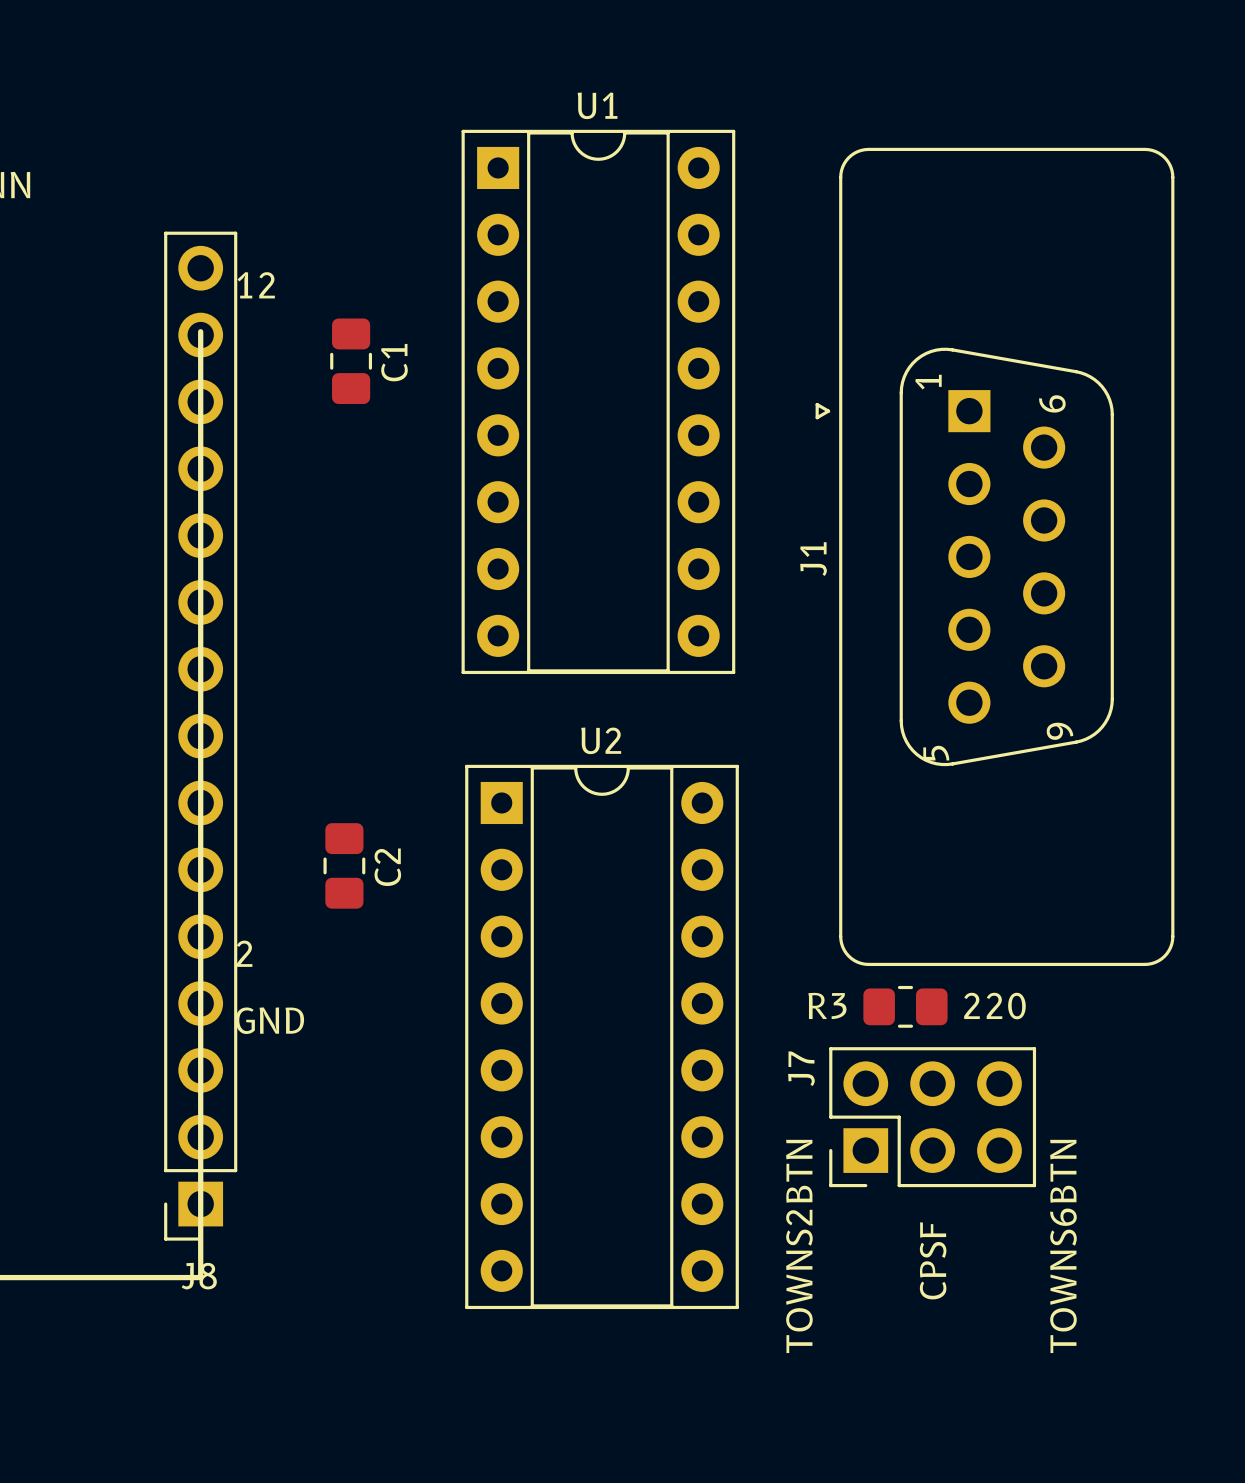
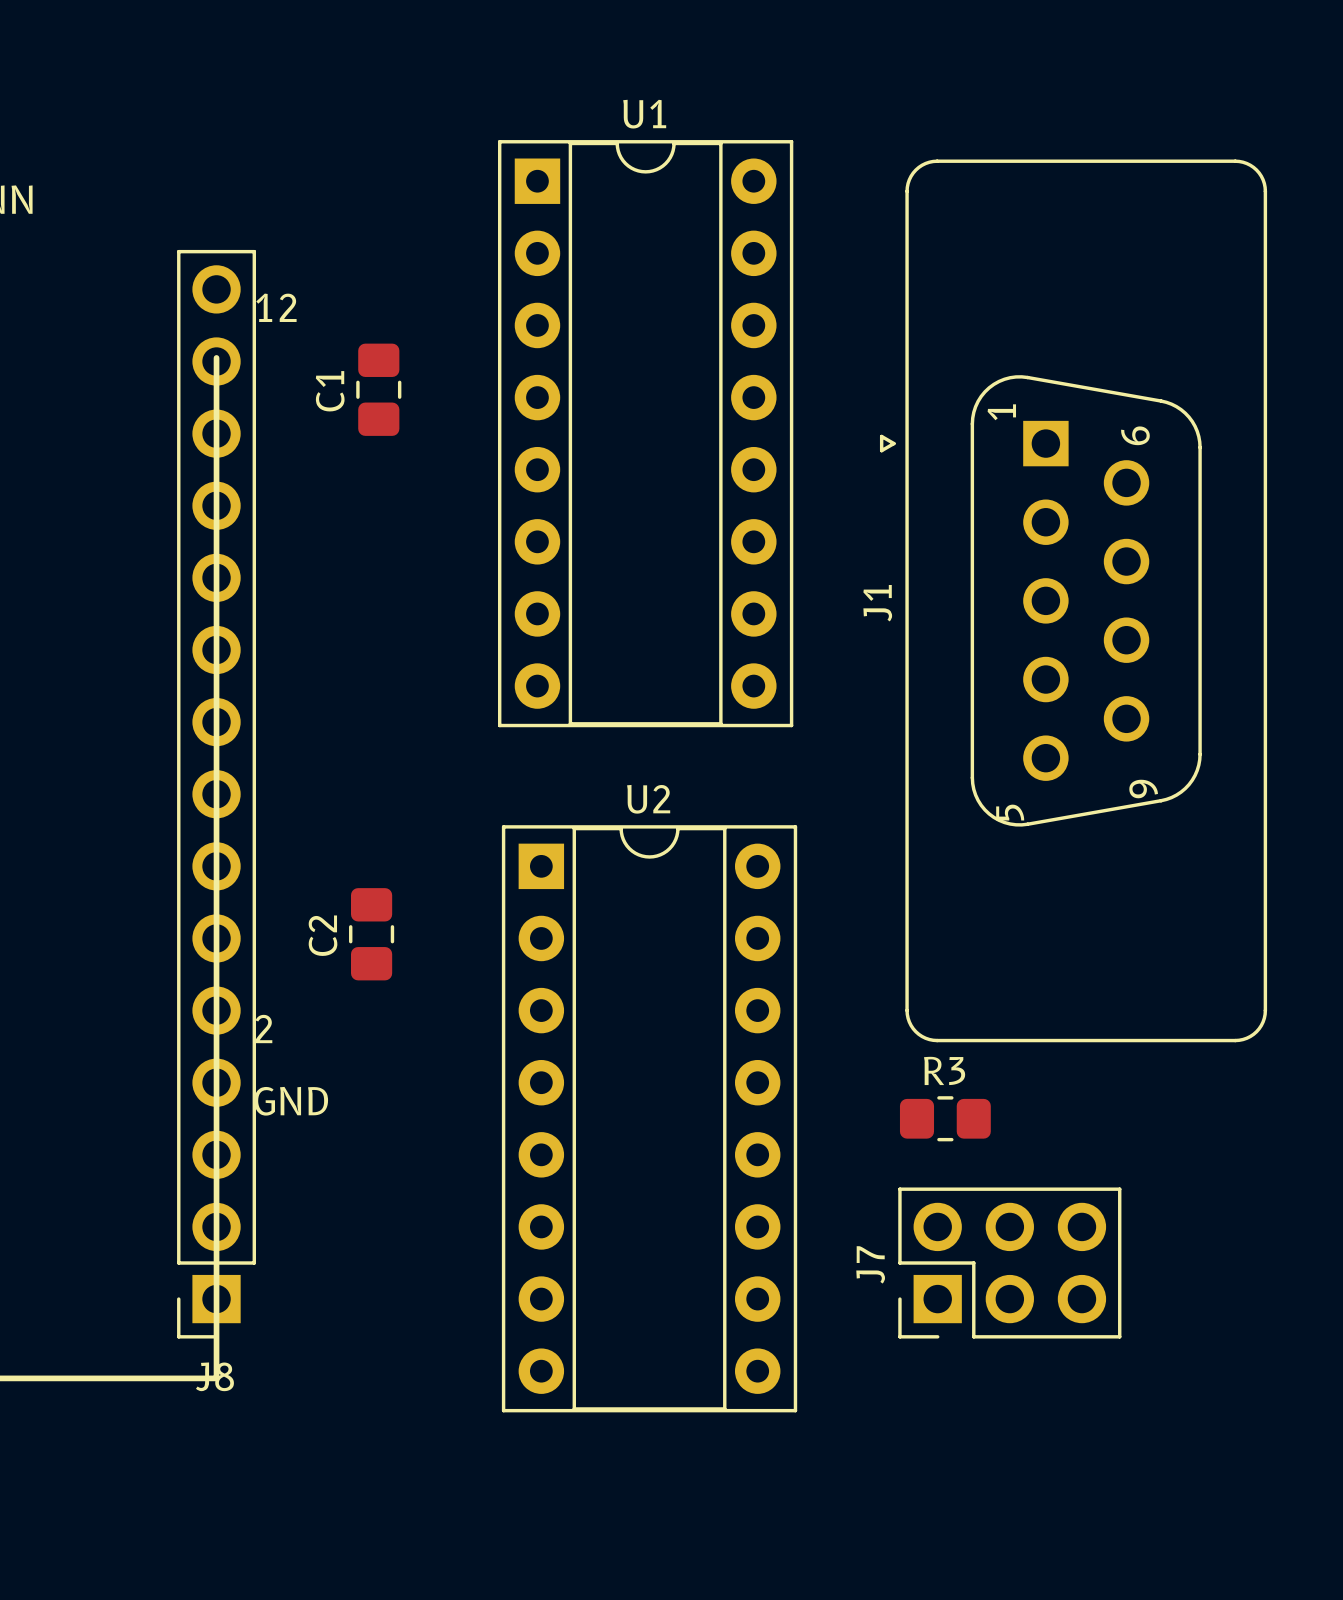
C1 name position: C1 (394, 362) -> C1 (330, 391)
C2 name position: C2 (387, 867) -> C2 (323, 935)
R3 name position: R3 (827, 1005) -> R3 (944, 1070)
R3 position: (905, 1006) -> (945, 1118)
R3 value: 220 (994, 1006) -> none
J7 name position: J7 (801, 1068) -> J7 (870, 1264)
J7 position: (932, 1117) -> (1009, 1263)
text: TOWNS2BTN (799, 1246) -> none
text: TOWNS6BTN (1063, 1246) -> none
text: CPSF (933, 1260) -> none

